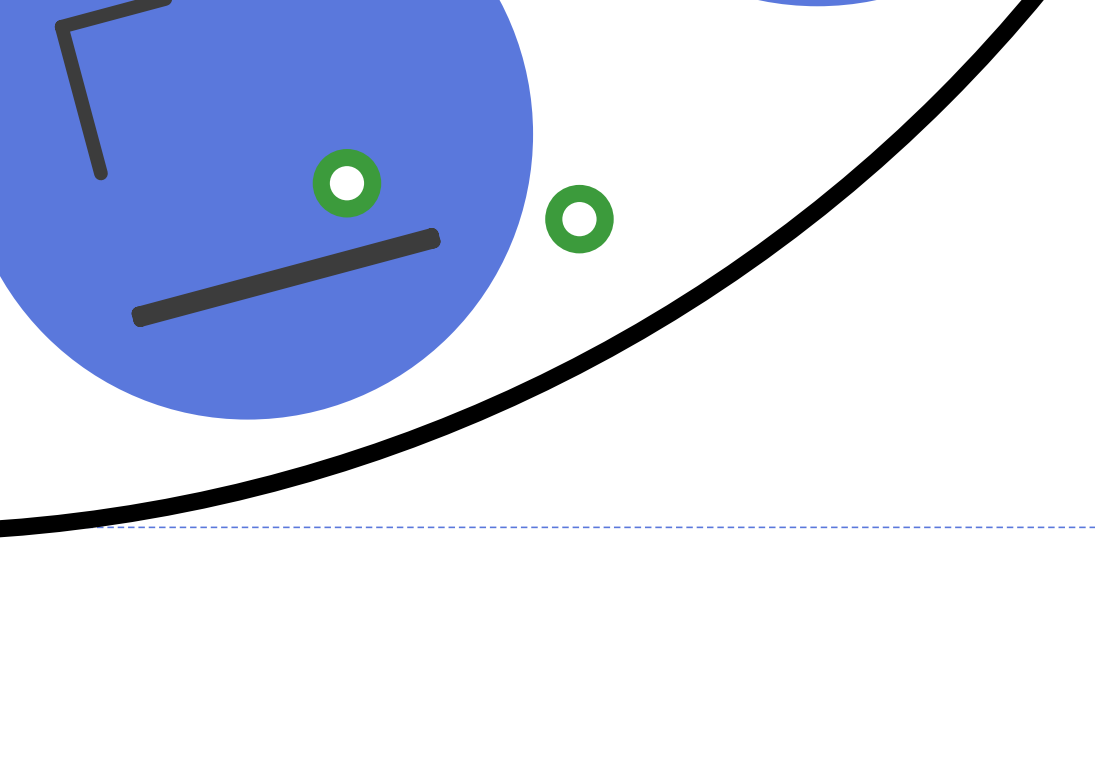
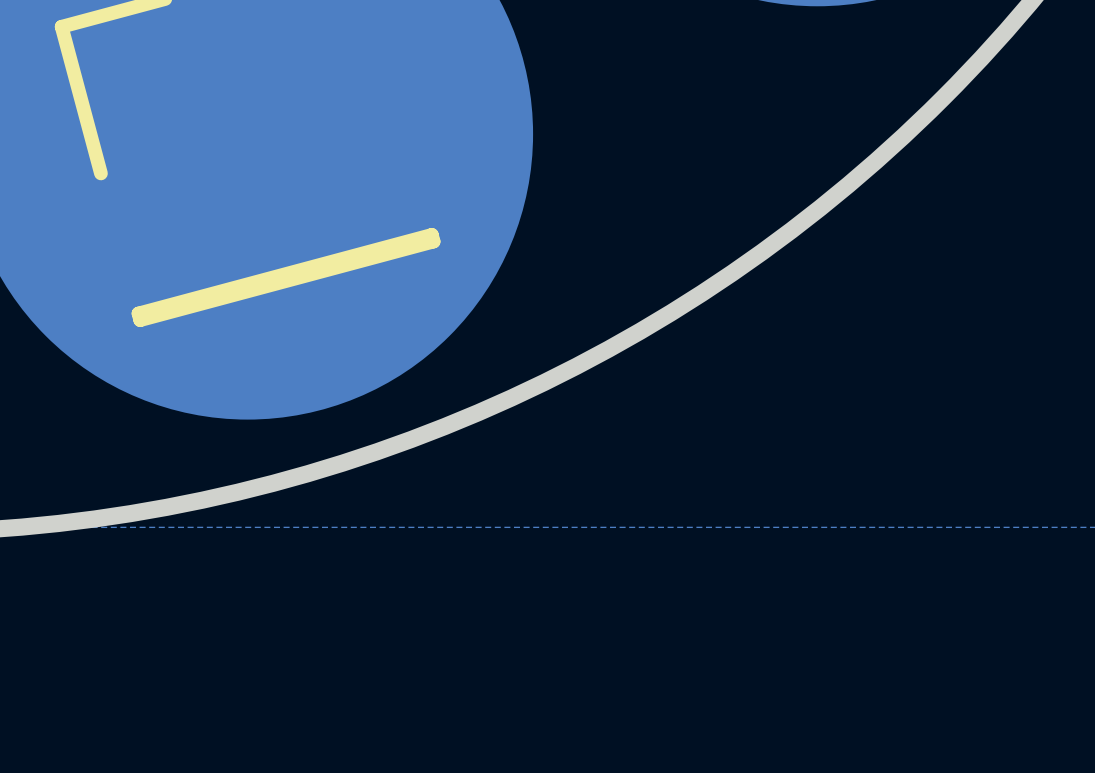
via: (346, 183) -> none
via: (579, 219) -> none

